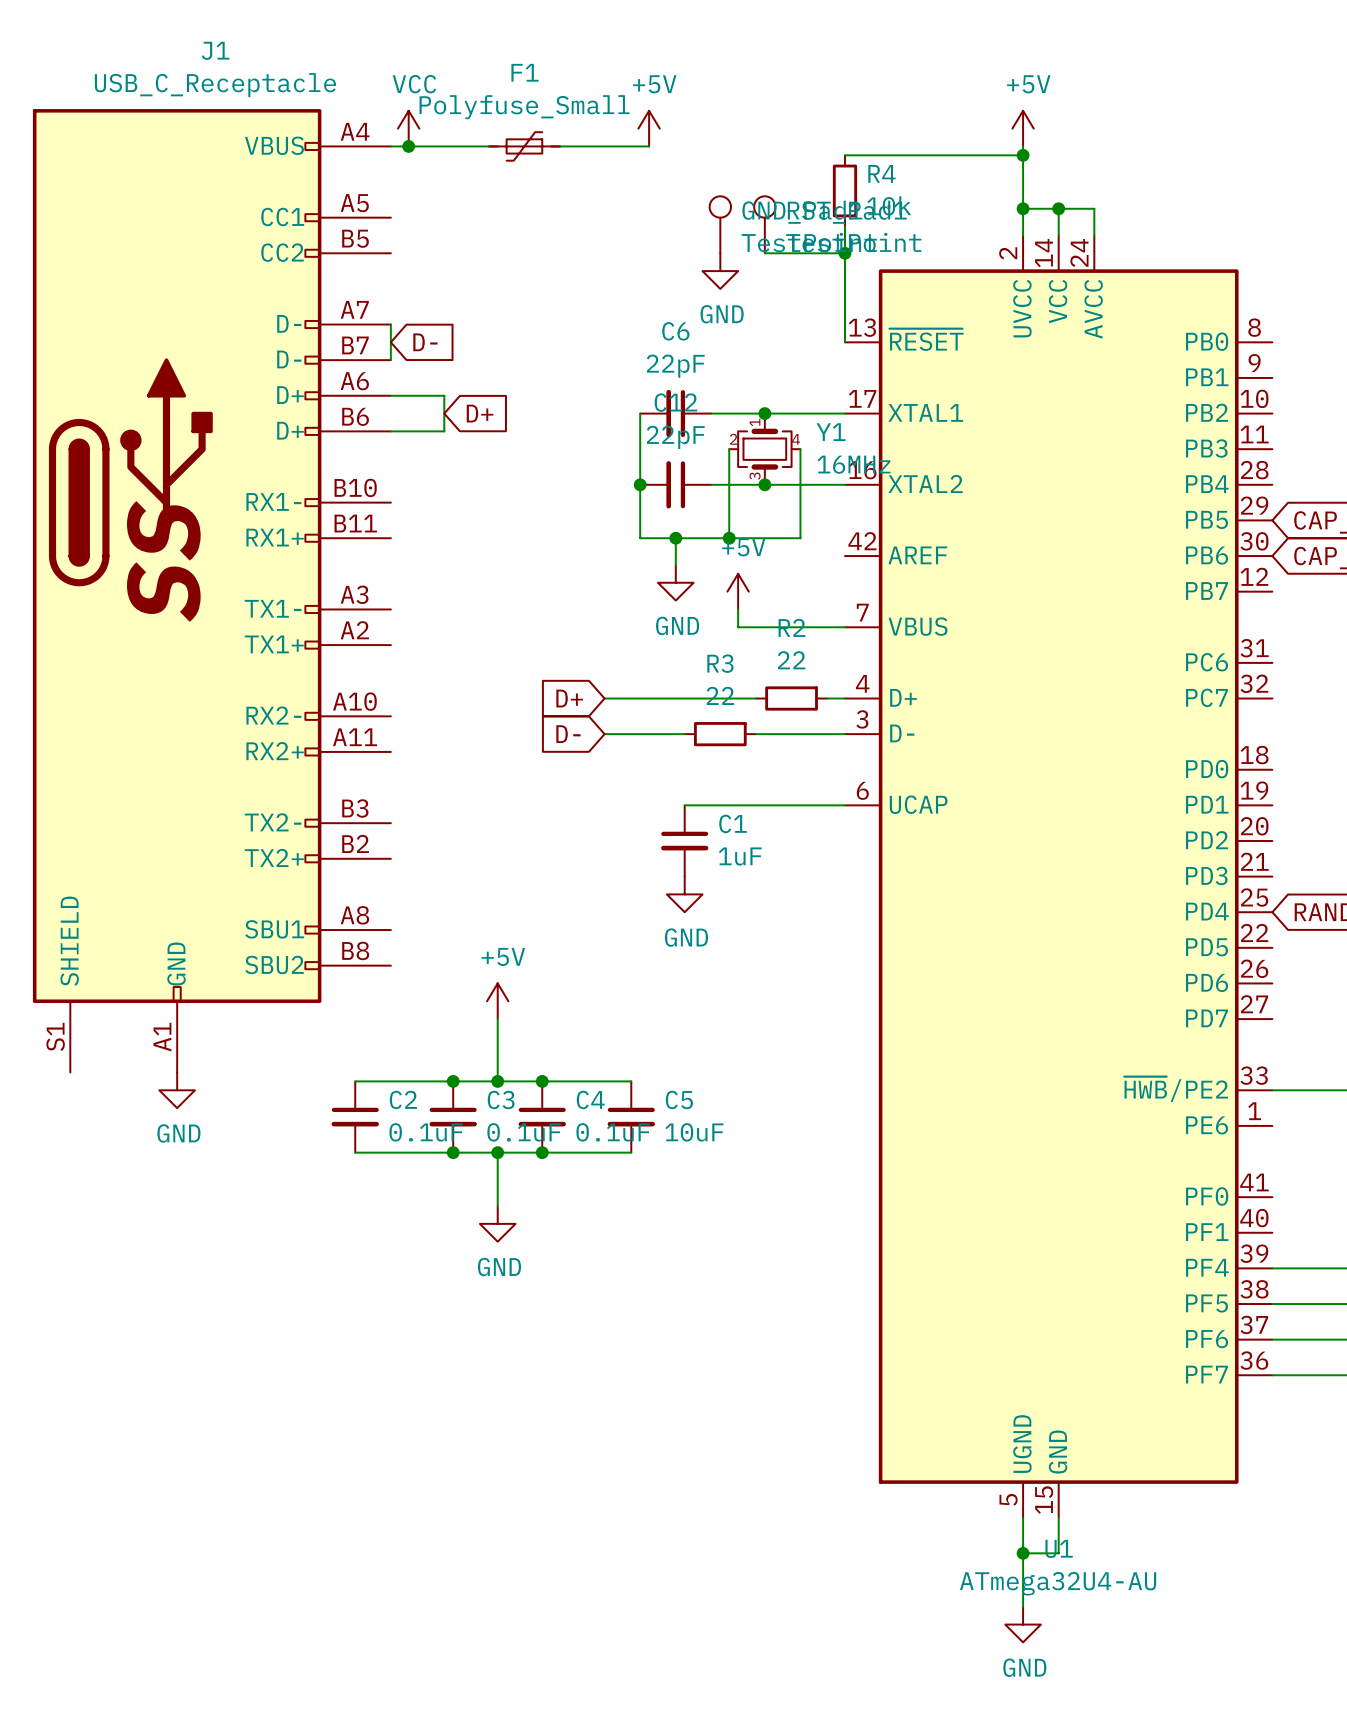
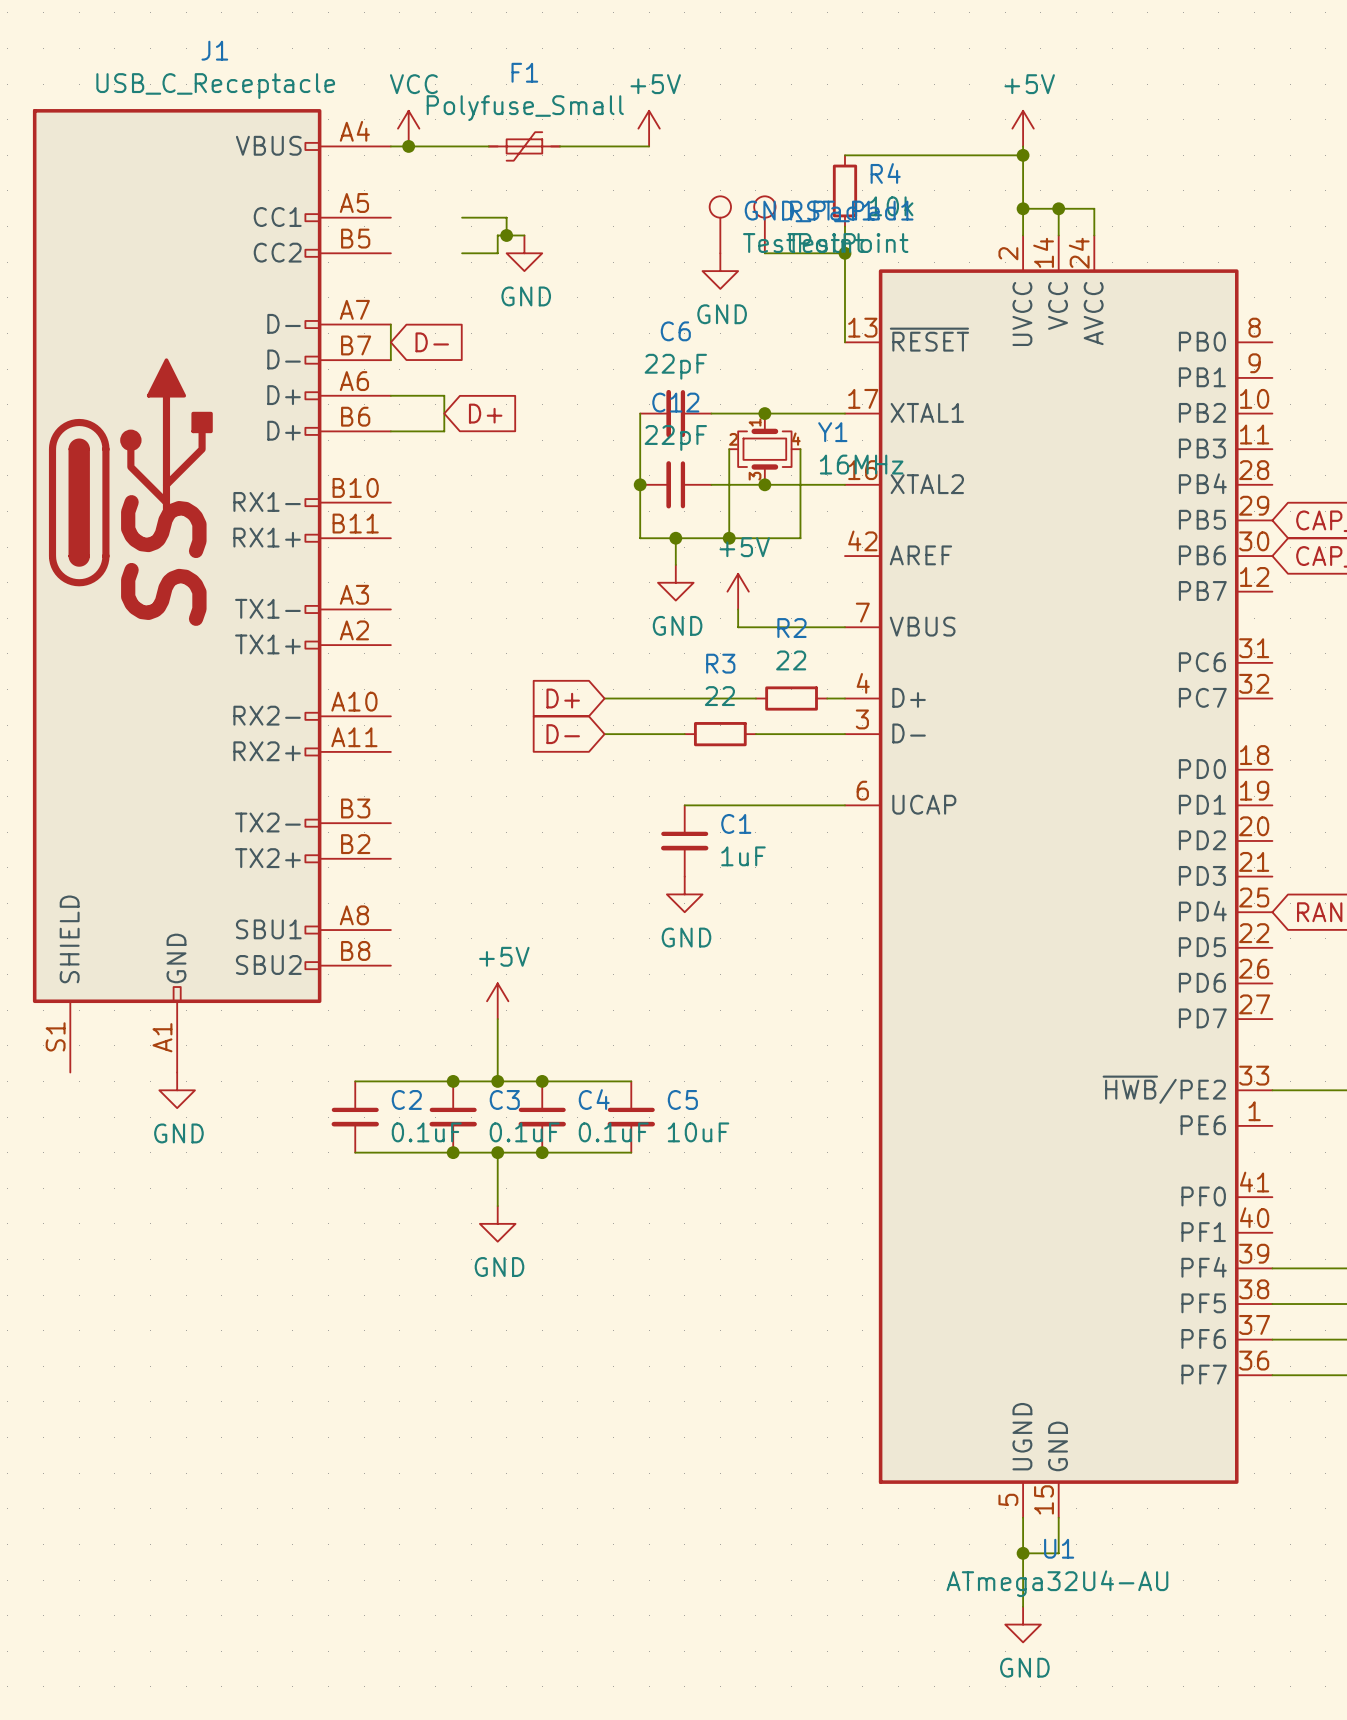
wire: none -> (462, 217) (506, 217) (506, 235)
junction: none -> (506, 235)
wire: none -> (524, 235) (497, 235) (497, 253) (462, 253)
power symbol: none -> GND (524, 253)

